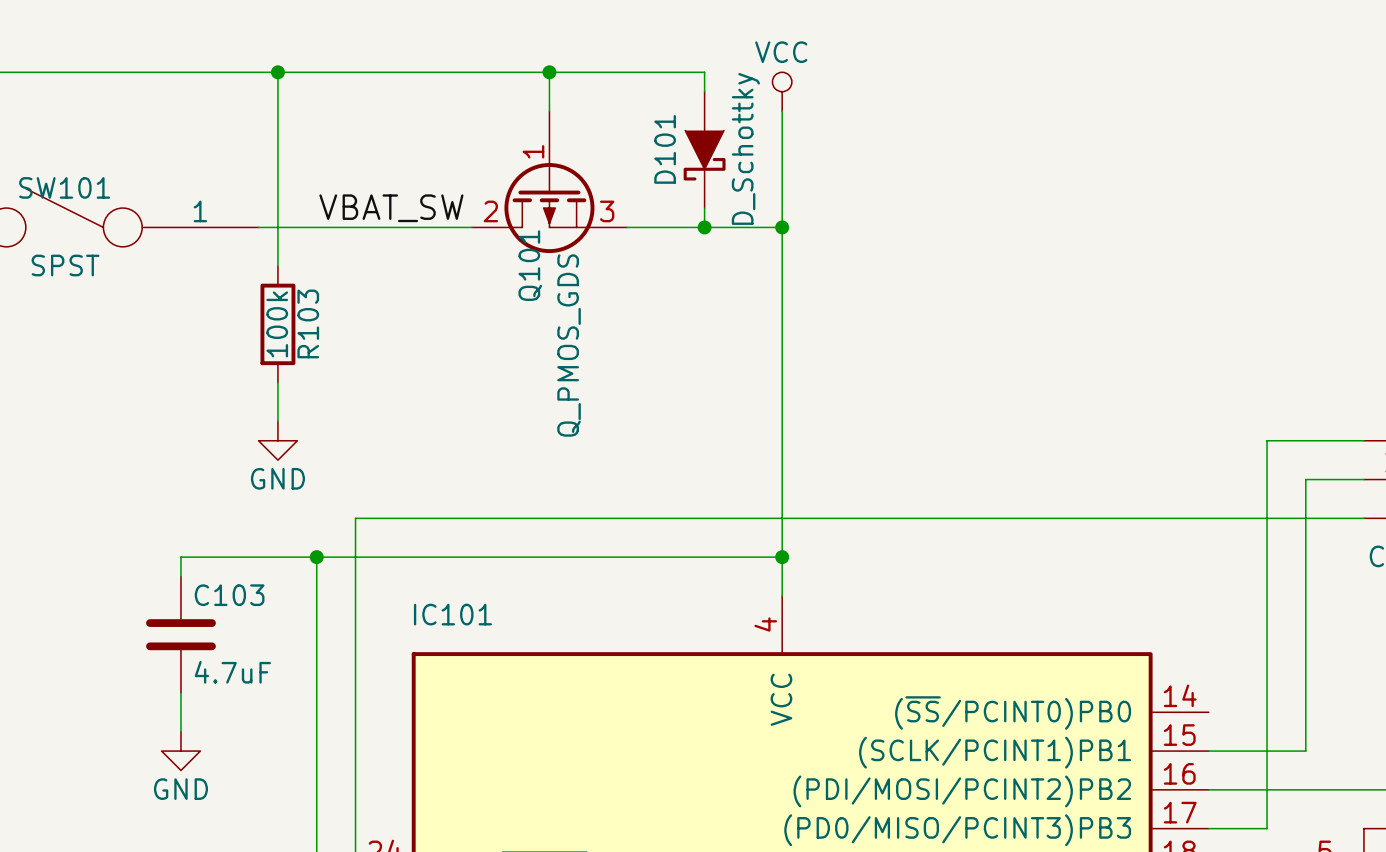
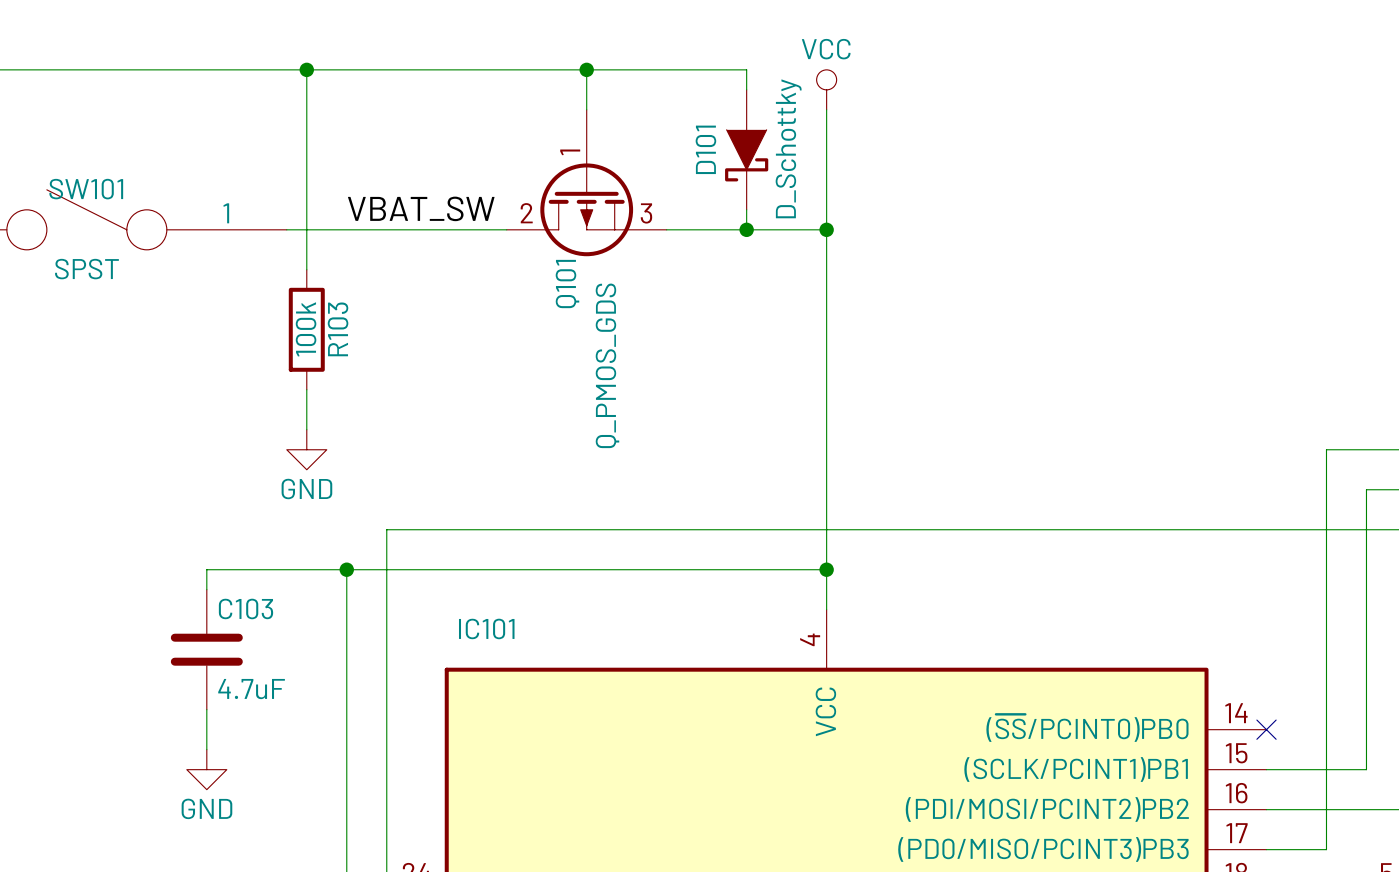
no-connect mark: none -> (1266, 729)

